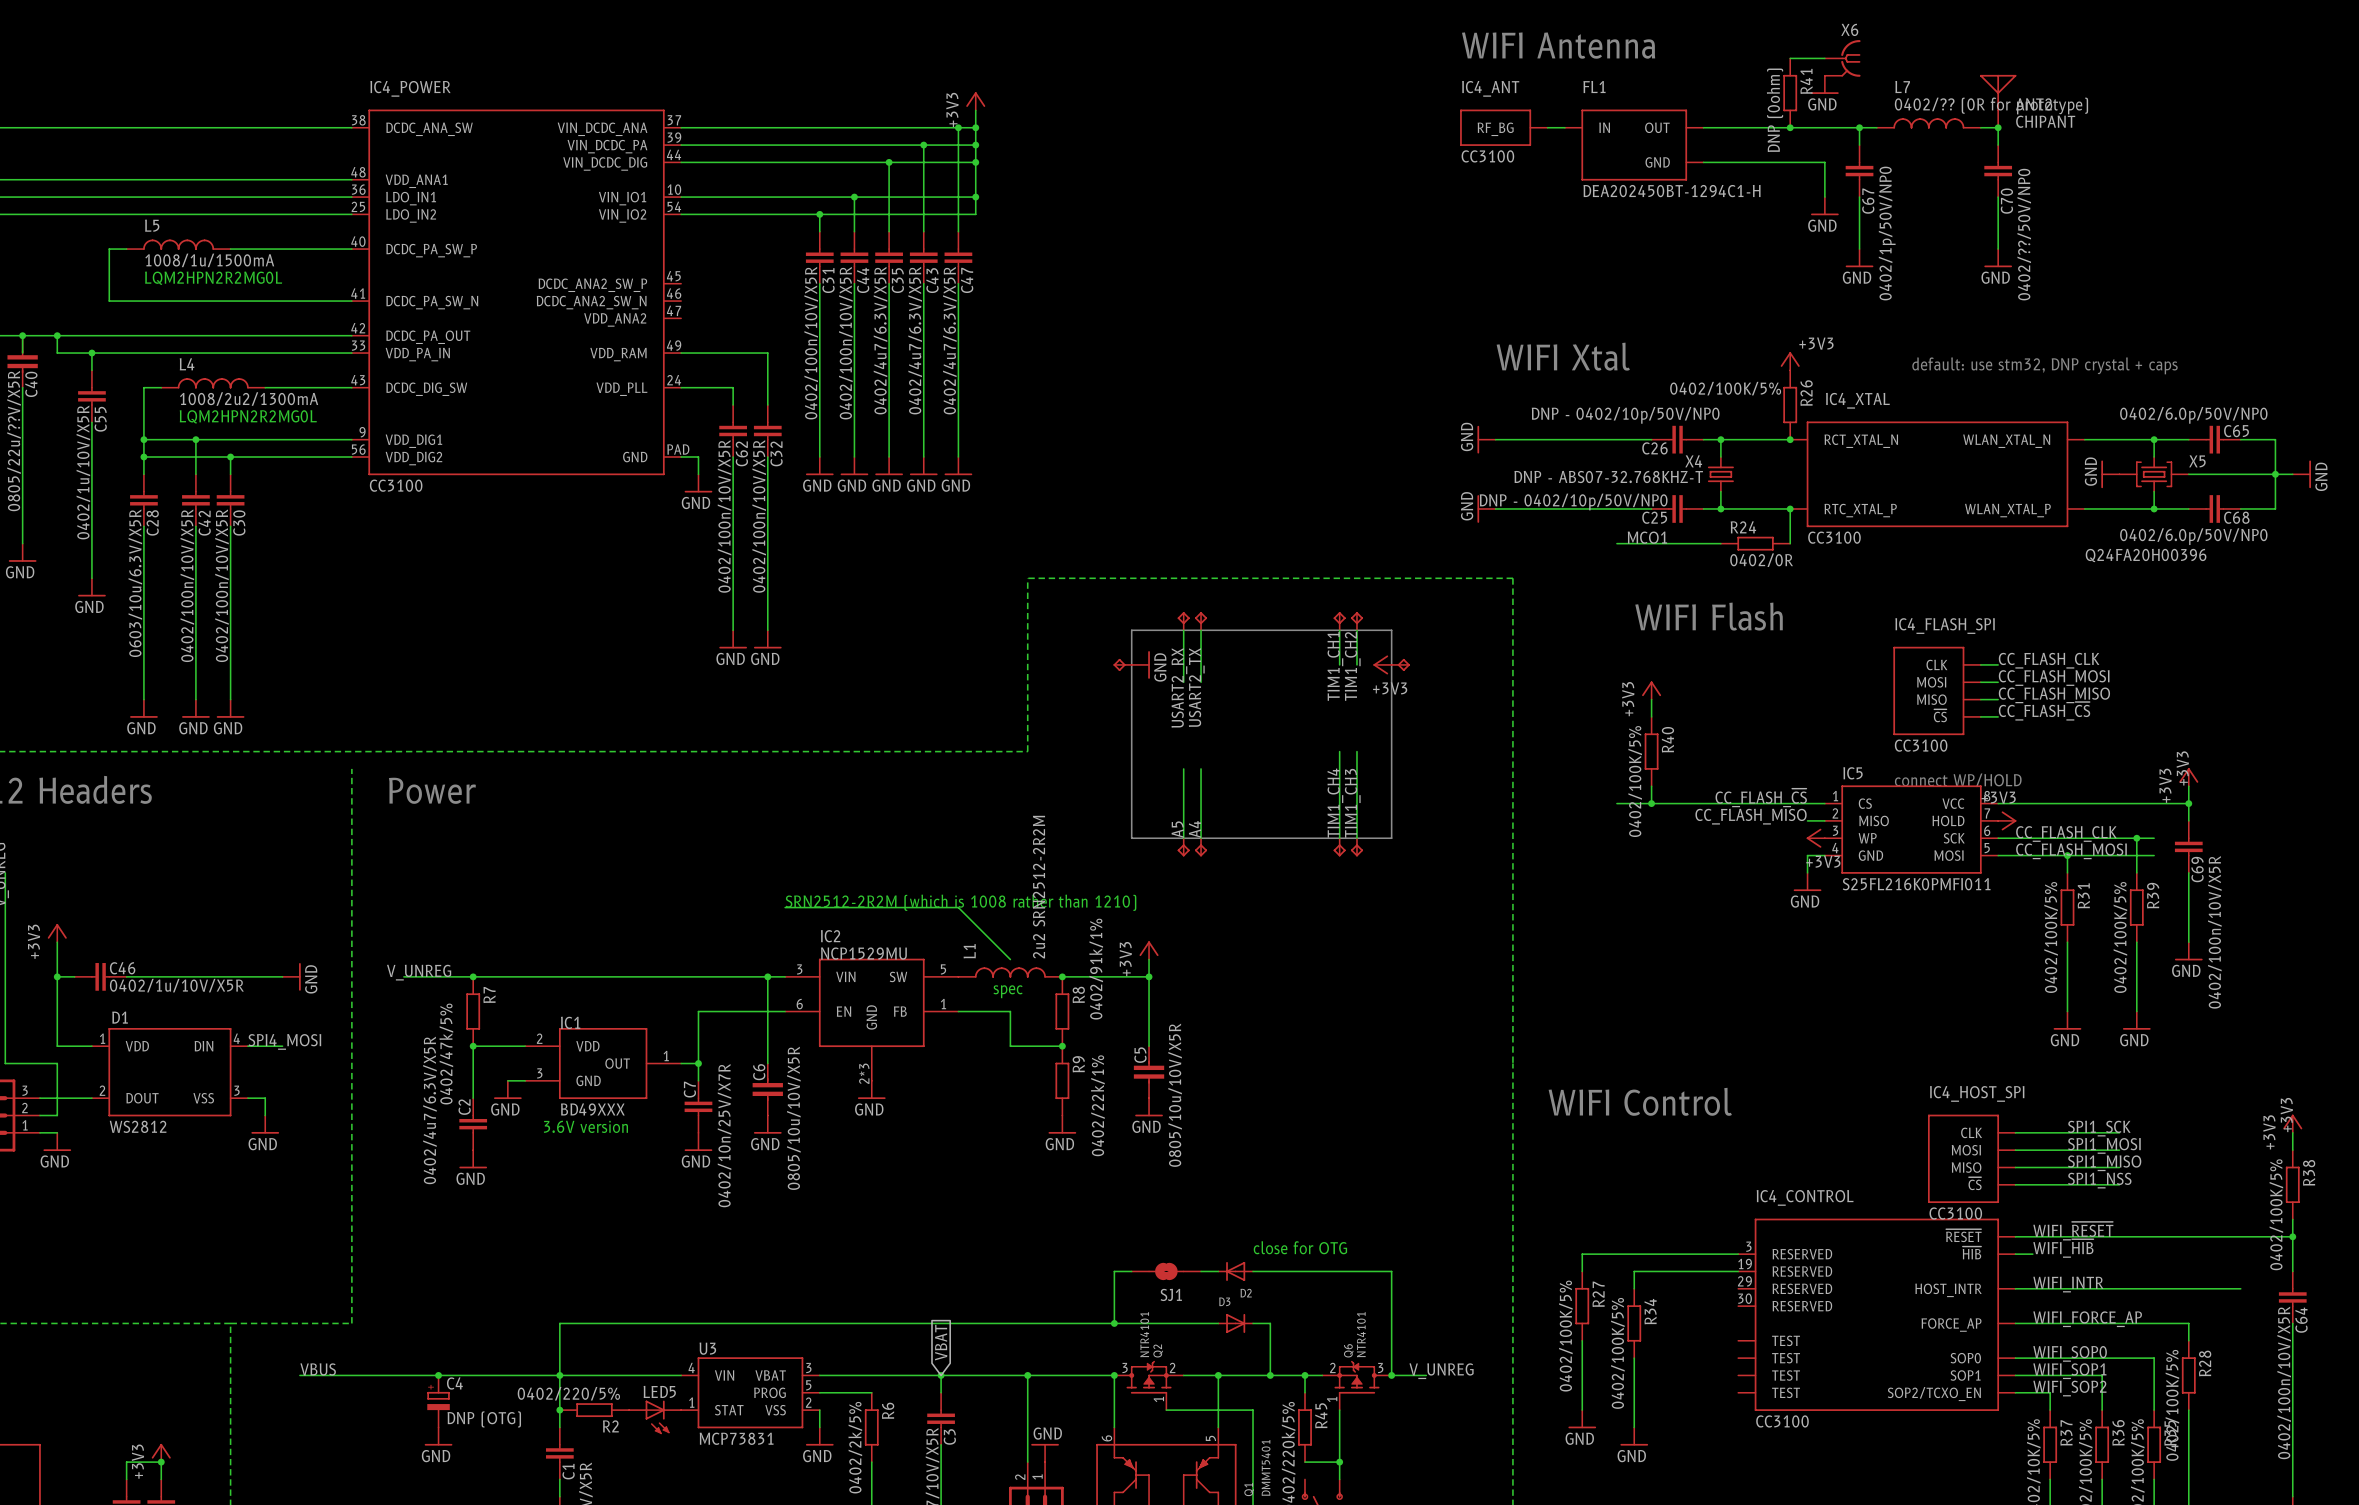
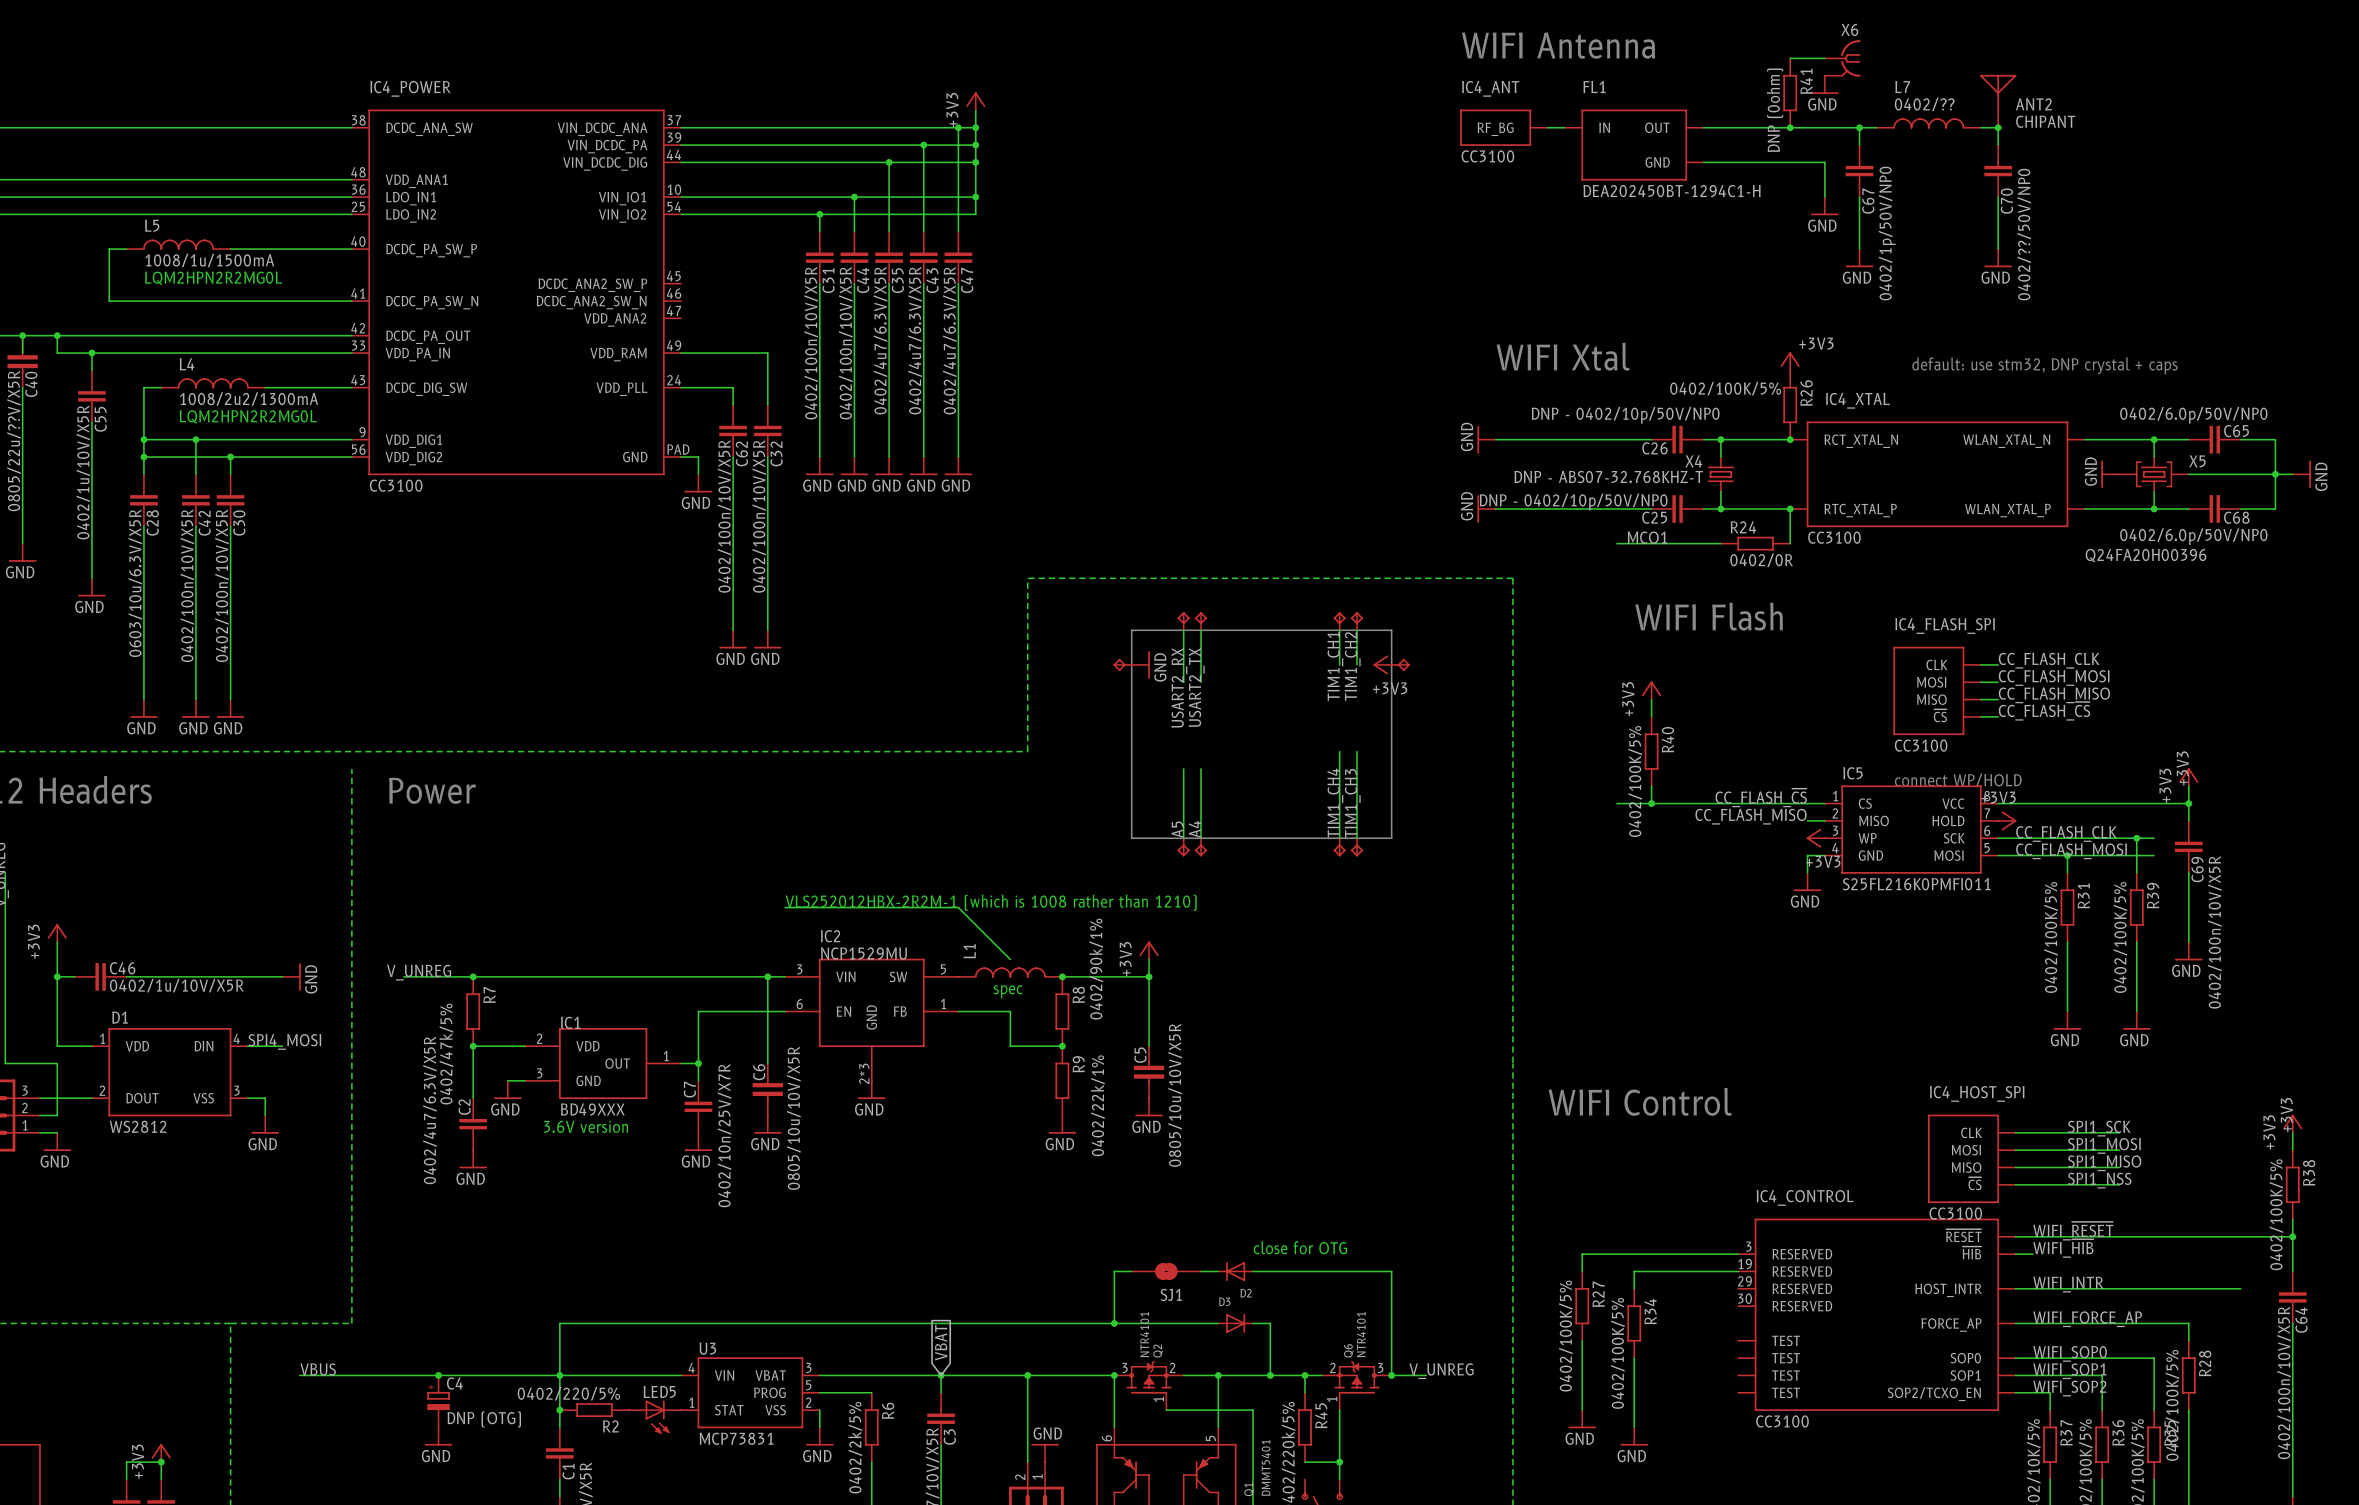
L7 value: 0402/?? (0R for prototype) (1991, 105) -> 0402/?? (1924, 104)
L1 value: 2u2 SRN2512-2R2M (1039, 887) -> none
text: SRN2512-2R2M (which is 1008 rather than 1210) (961, 902) -> VLS252012HBX-2R2M-1 (which is 1008 rather than 1210) (991, 902)
R8 value: 0402/91k/1% (1096, 969) -> 0402/90k/1% (1096, 969)

